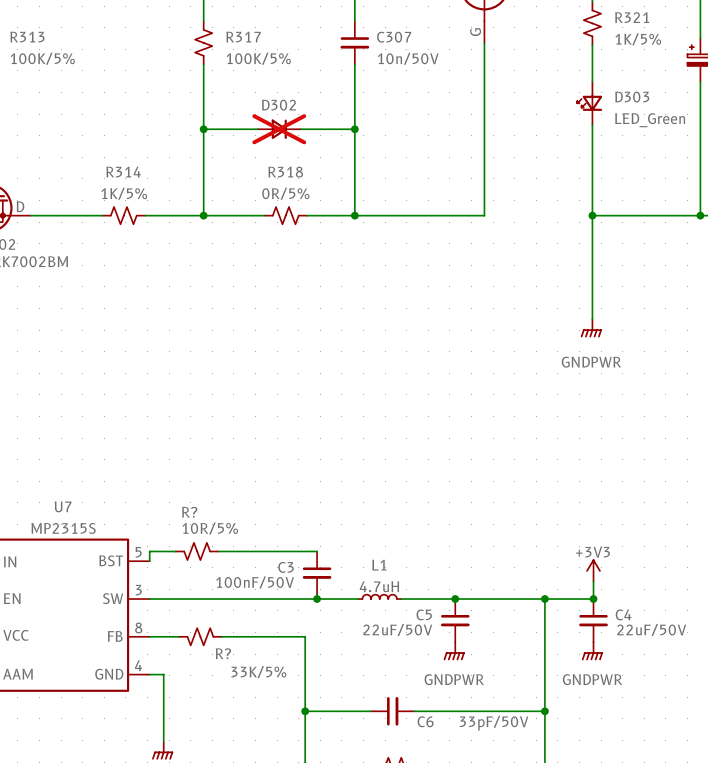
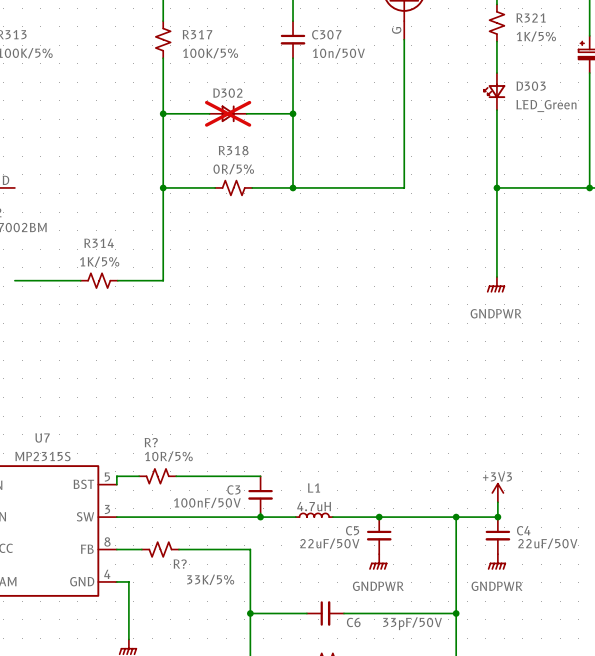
wire: (30, 215) (102, 215) -> none
R314 position: (123, 215) -> (99, 280)
wire: (145, 215) (203, 215) -> (117, 280) (163, 280) (163, 187)
wire: none -> (14, 280) (80, 280)

